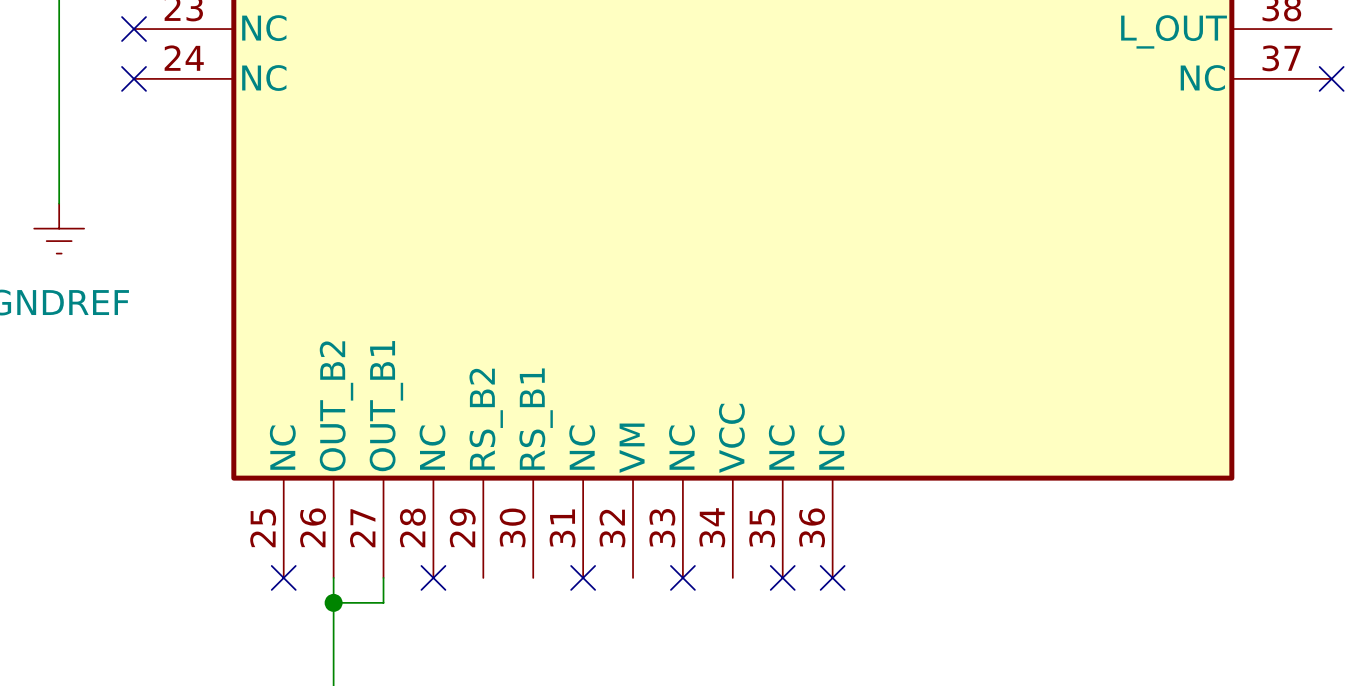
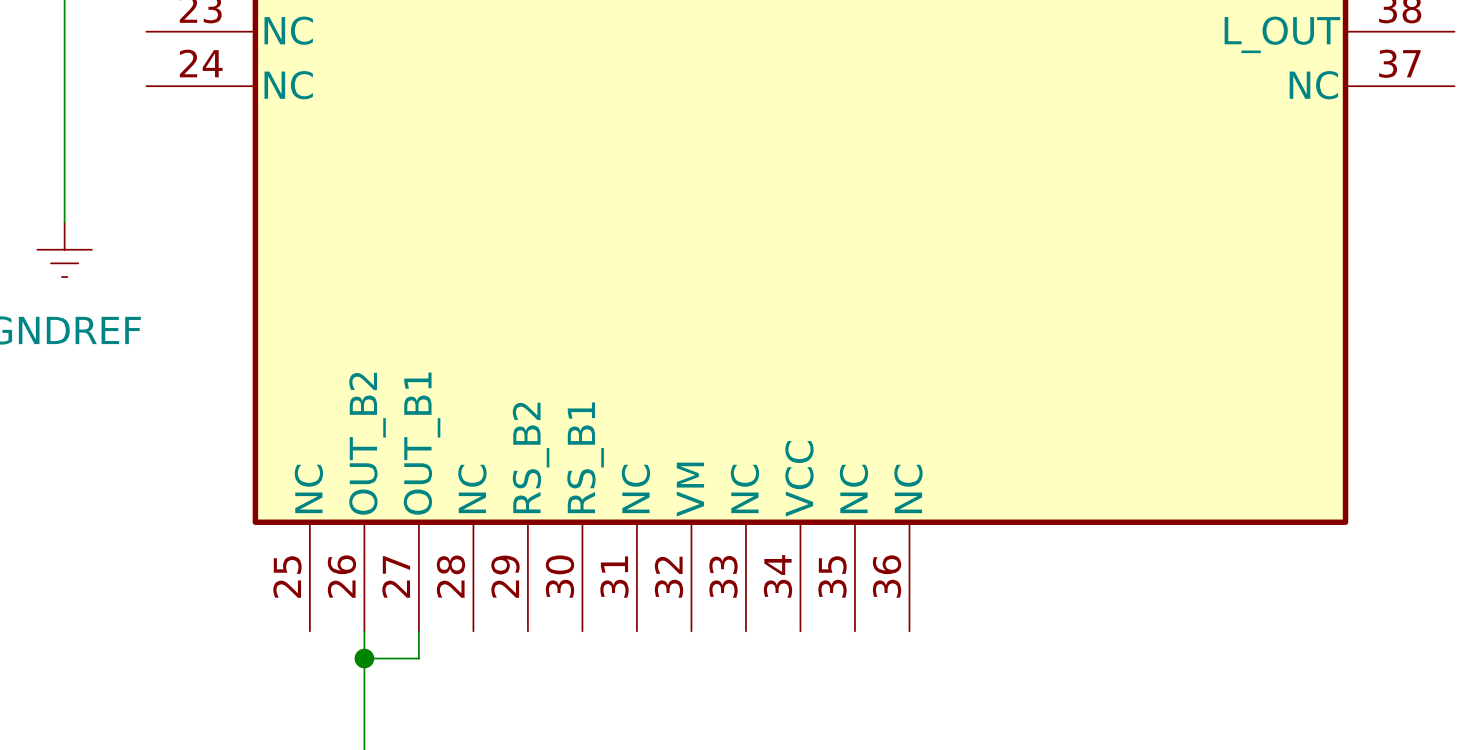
no-connect mark: (134, 29) -> none
no-connect mark: (134, 78) -> none
no-connect mark: (1331, 78) -> none
no-connect mark: (283, 577) -> none
no-connect mark: (433, 577) -> none
no-connect mark: (583, 577) -> none
no-connect mark: (682, 577) -> none
no-connect mark: (782, 577) -> none
no-connect mark: (832, 577) -> none

